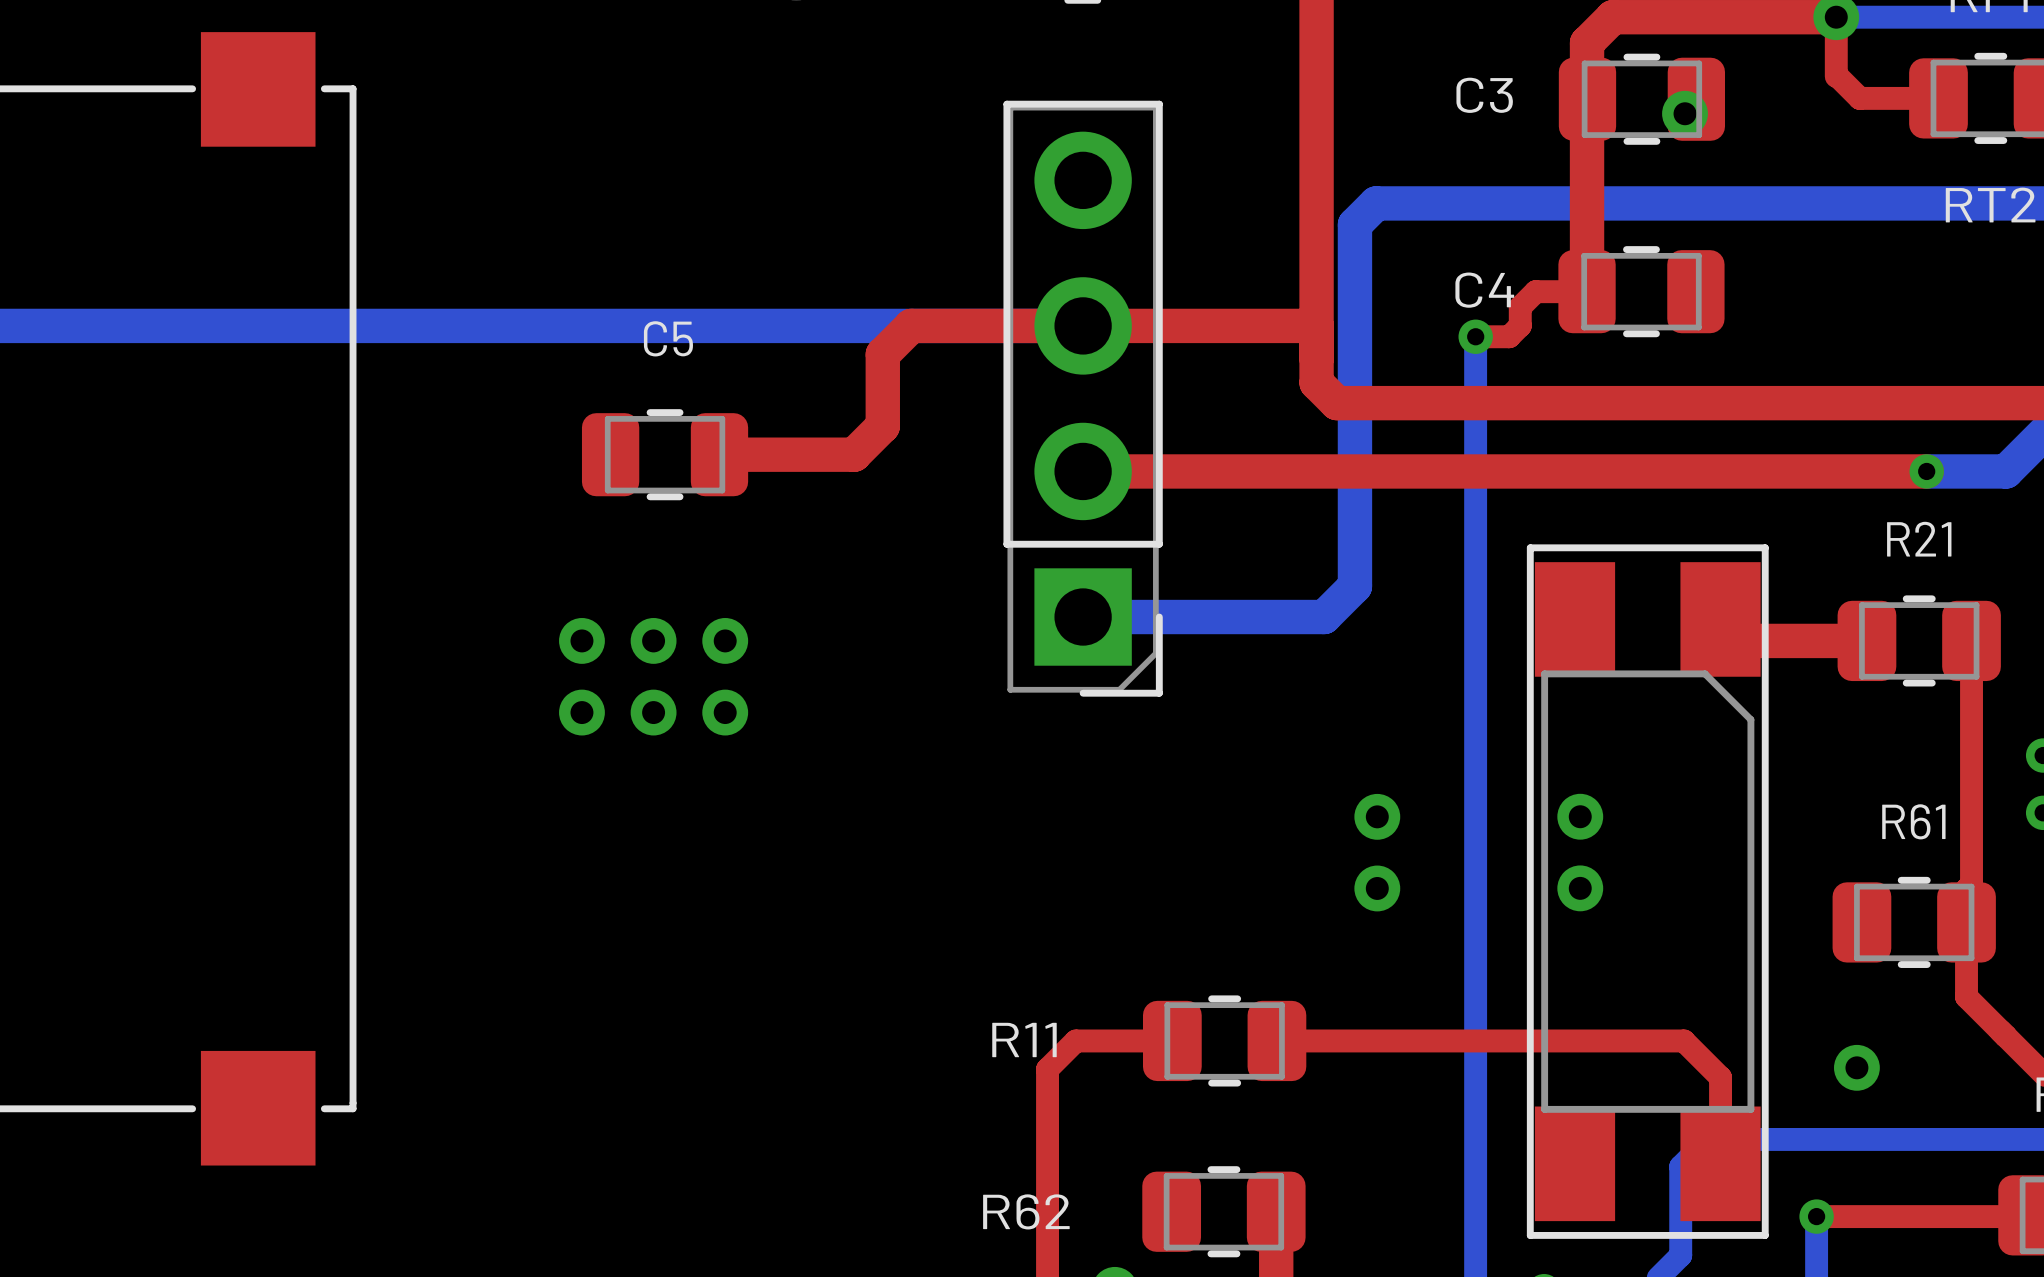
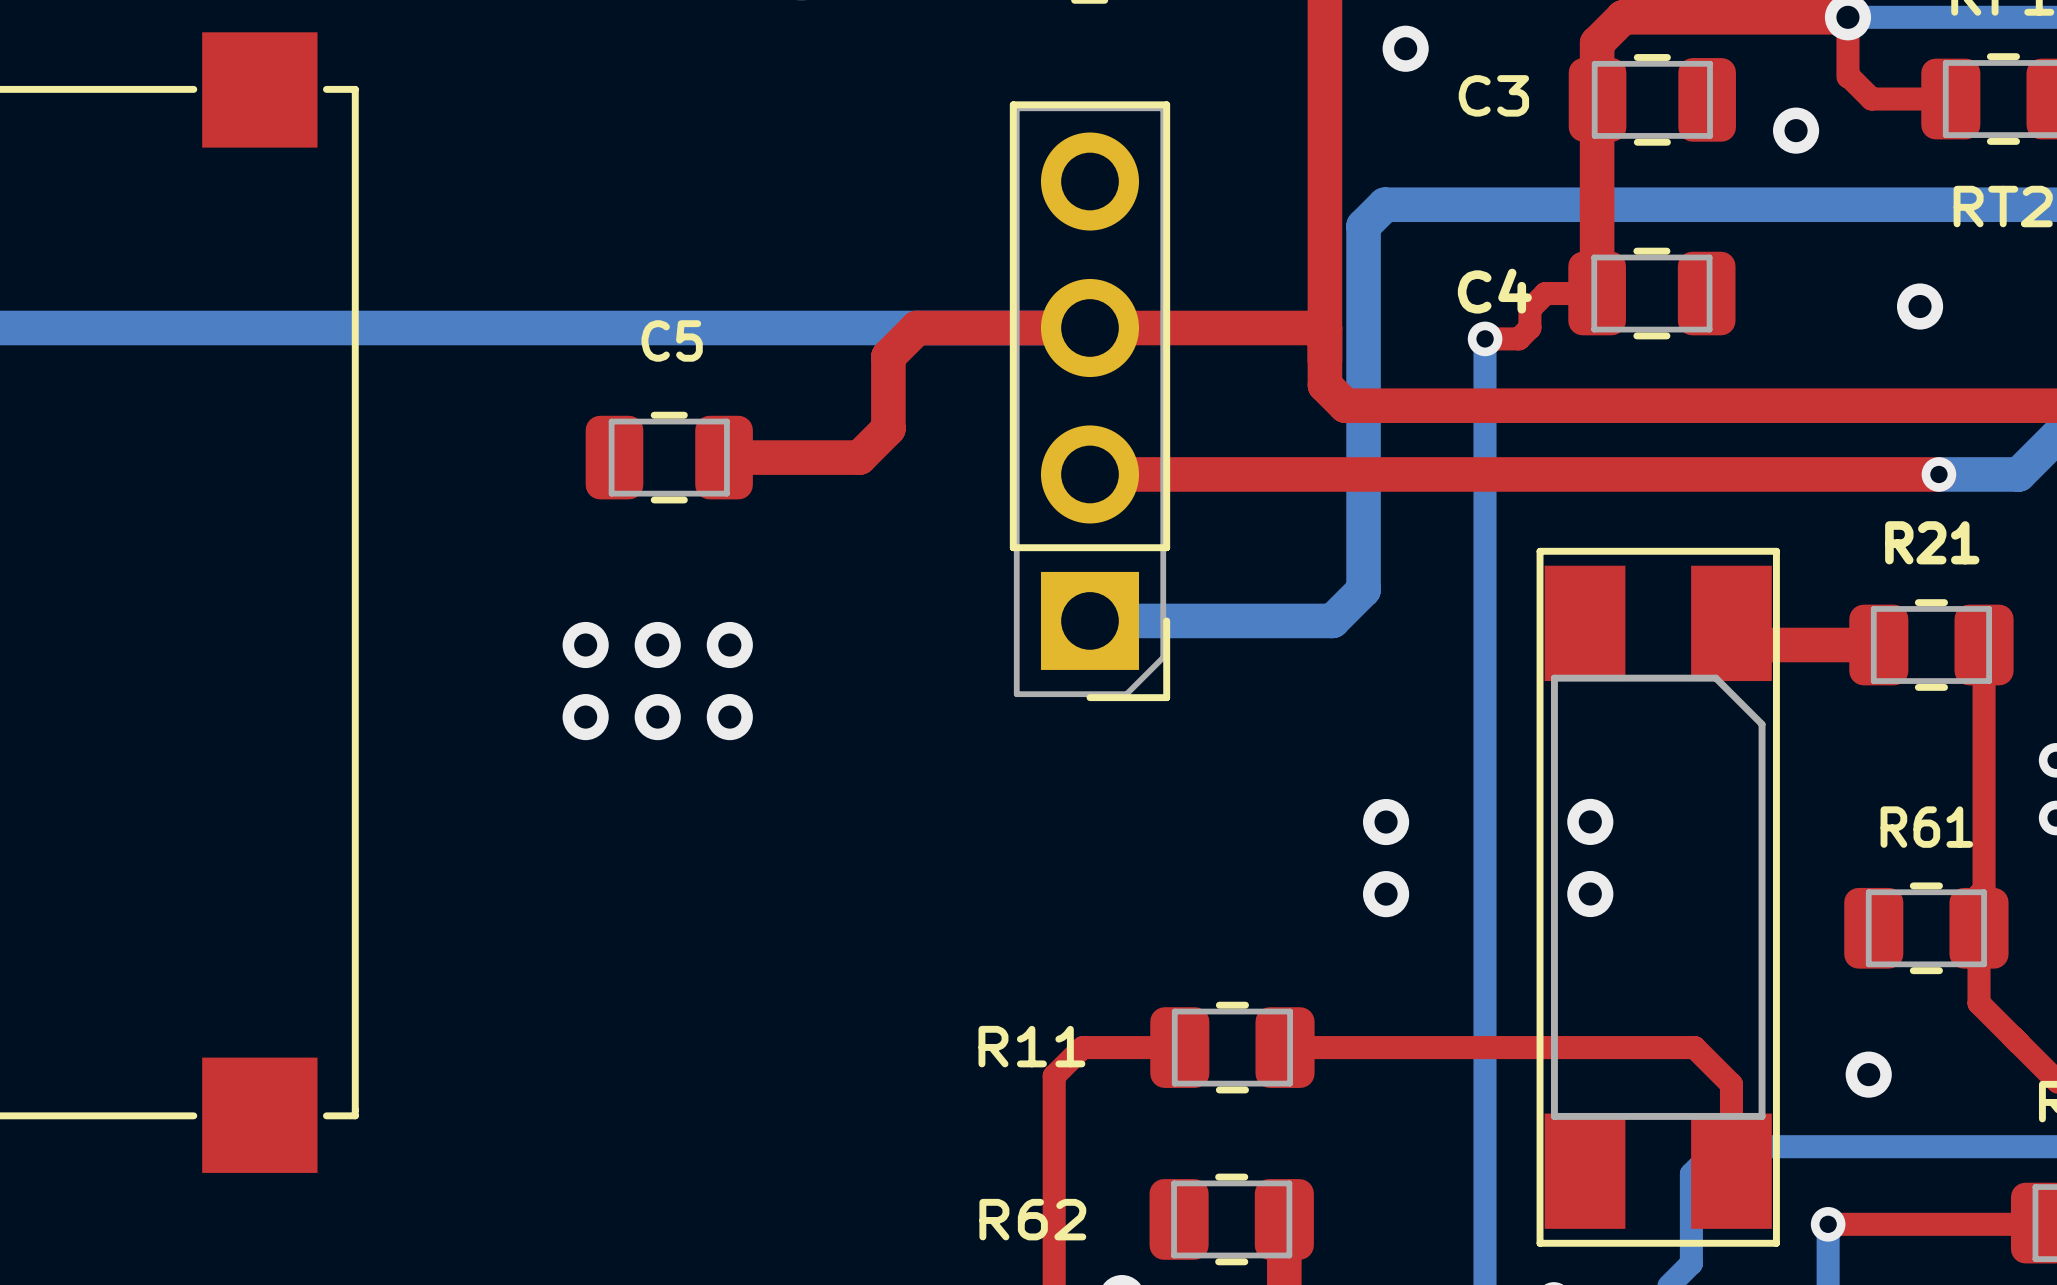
via: none -> (1405, 48)
via position: (1685, 113) -> (1796, 130)
via: none -> (1920, 306)

